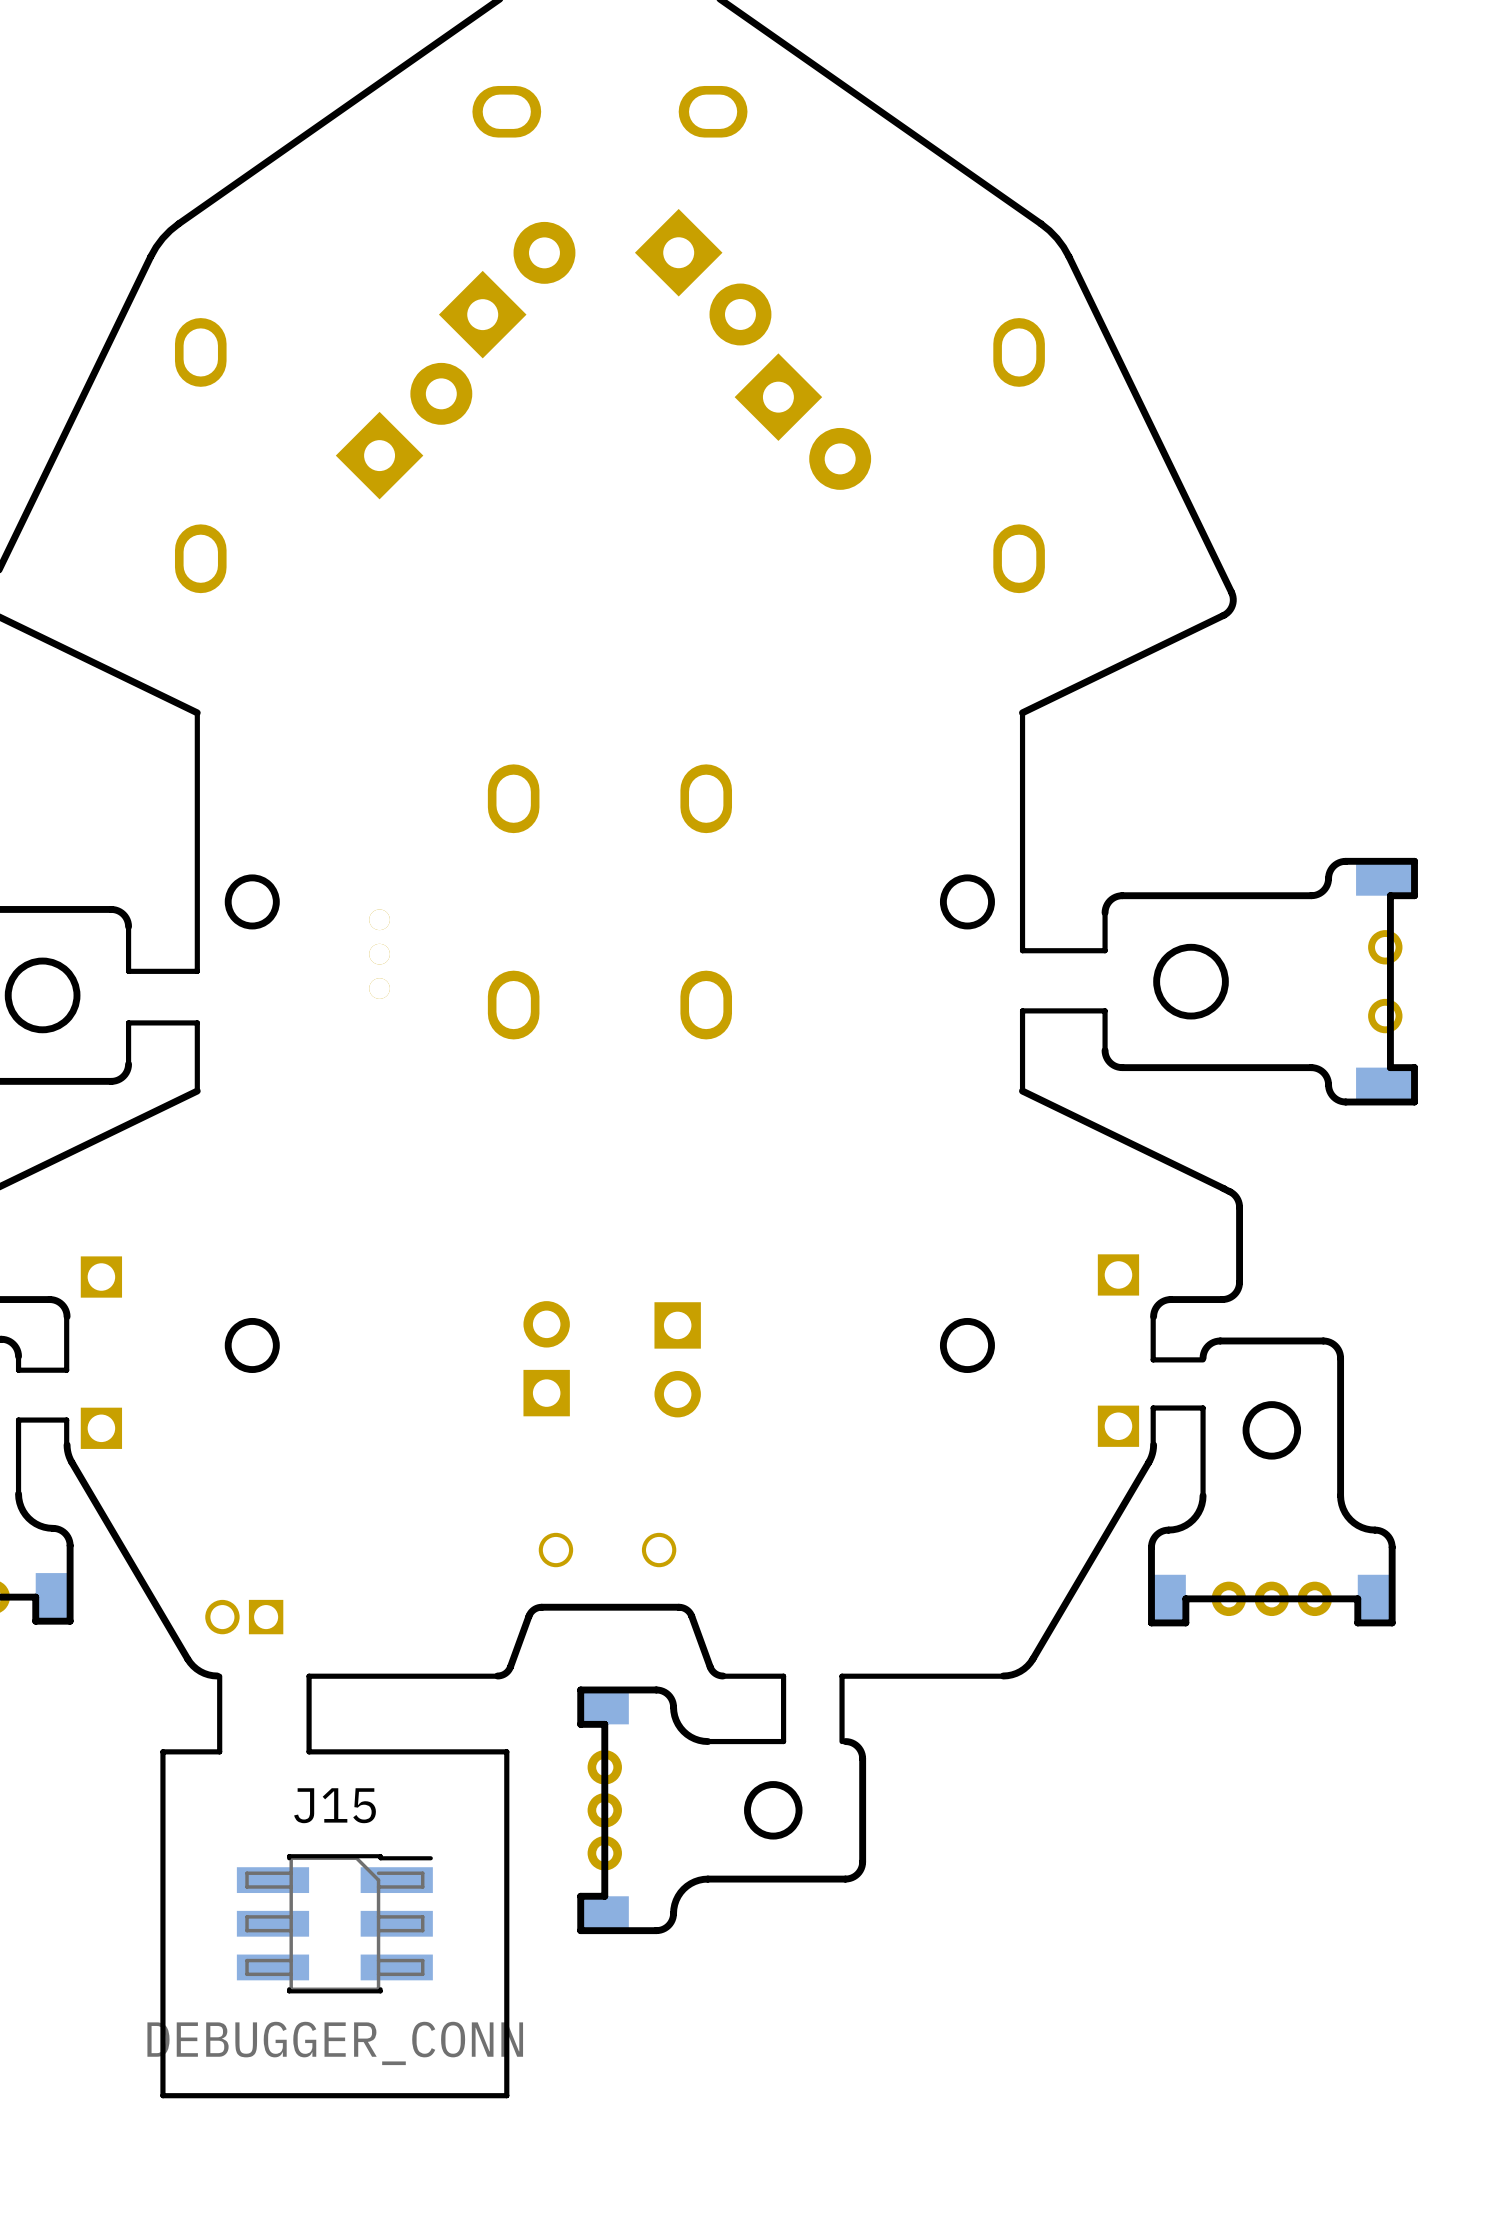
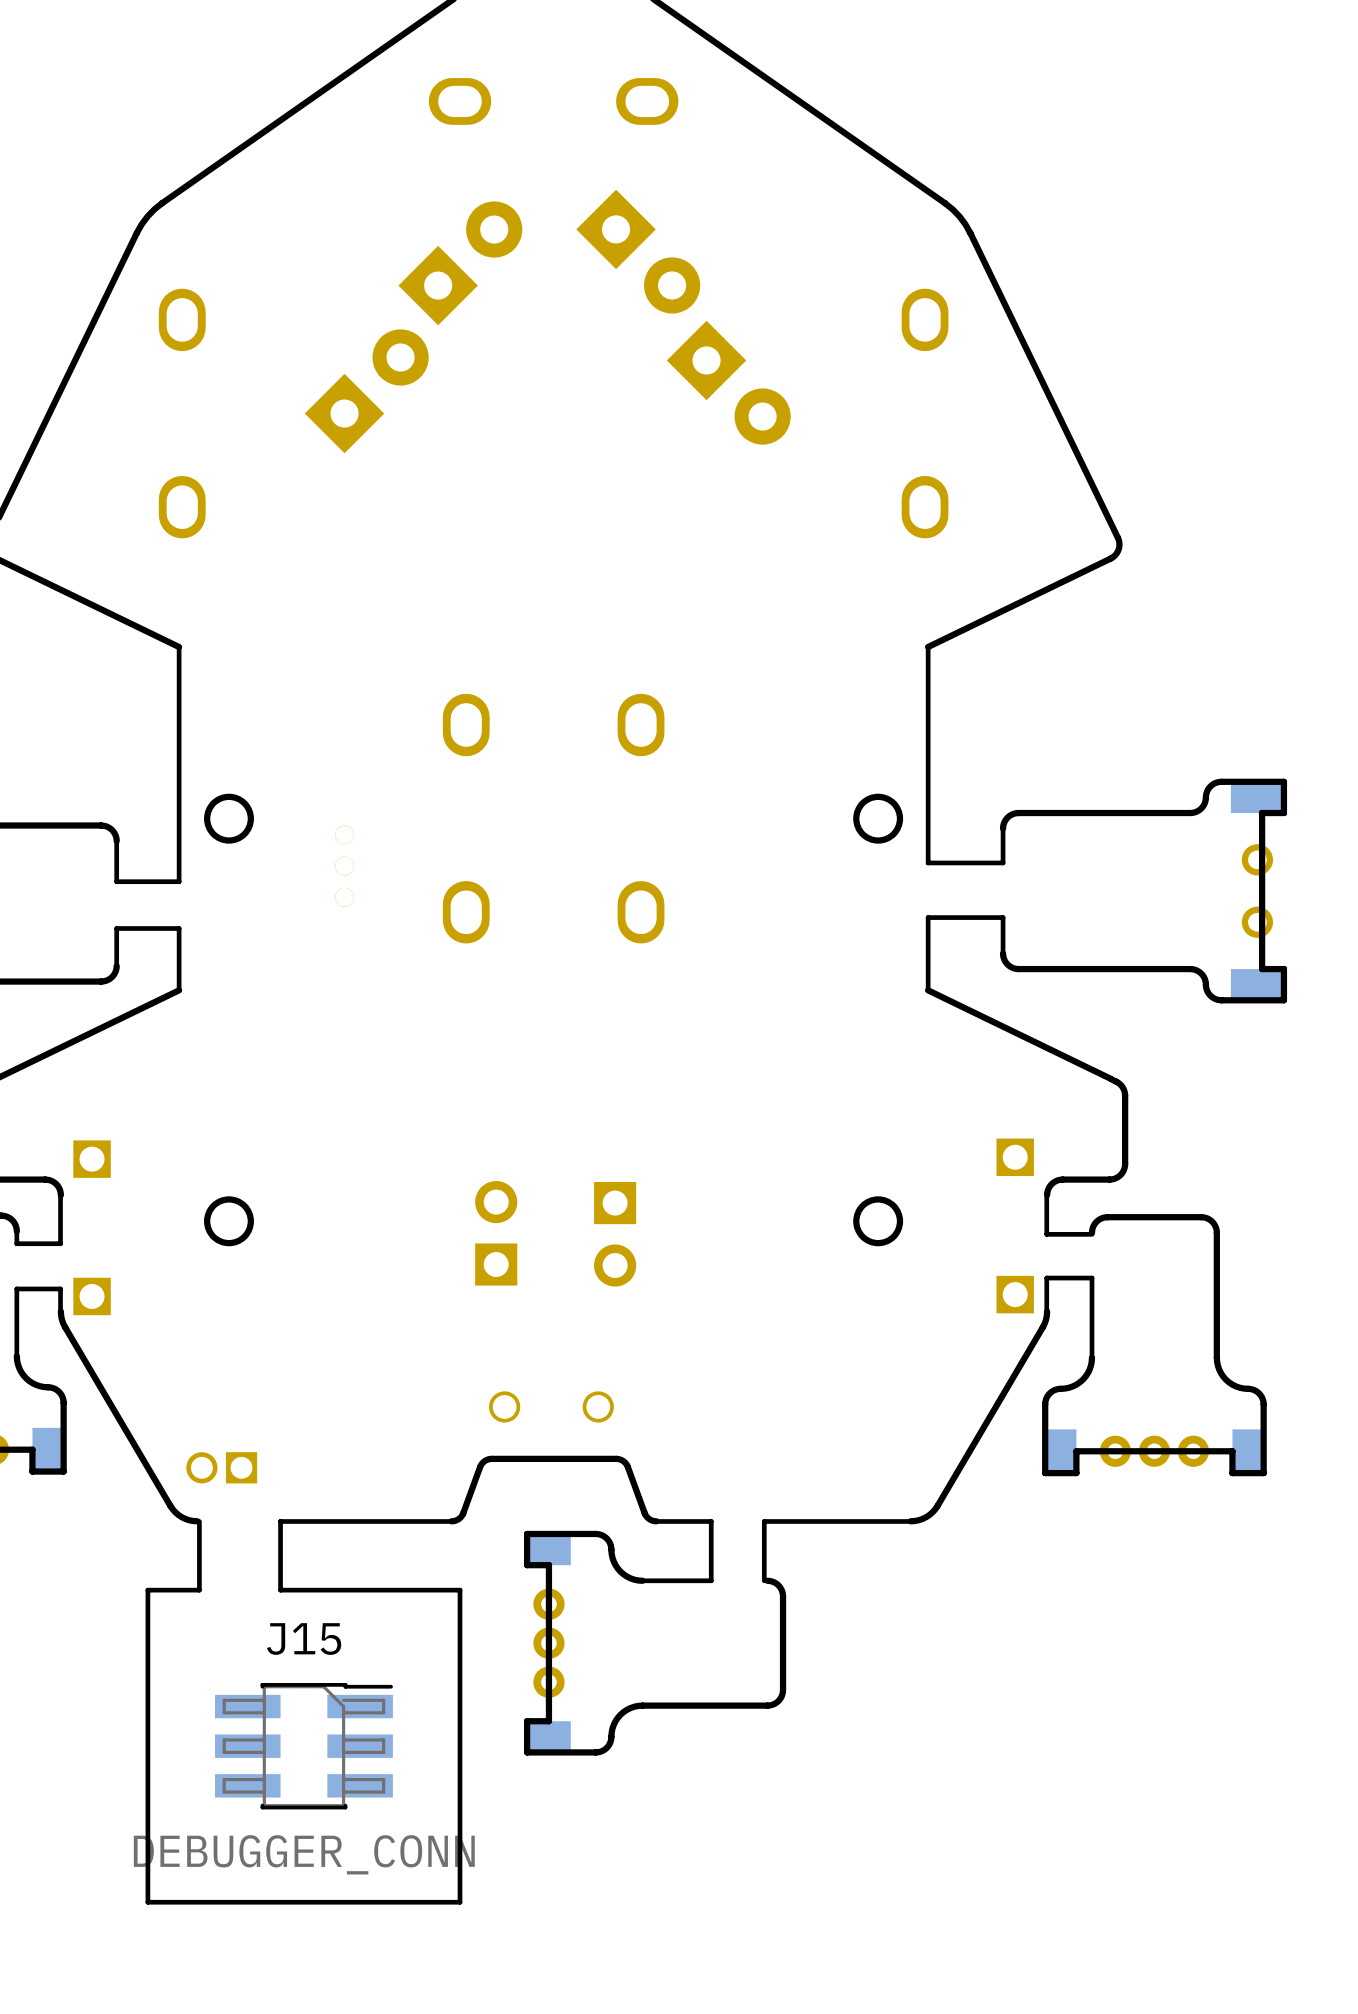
round board edge: [1153, 943, 1229, 1020] -> none
round board edge: [4, 957, 81, 1034] -> none
round board edge: [1242, 1401, 1302, 1460] -> none
round board edge: [744, 1781, 803, 1840] -> none

